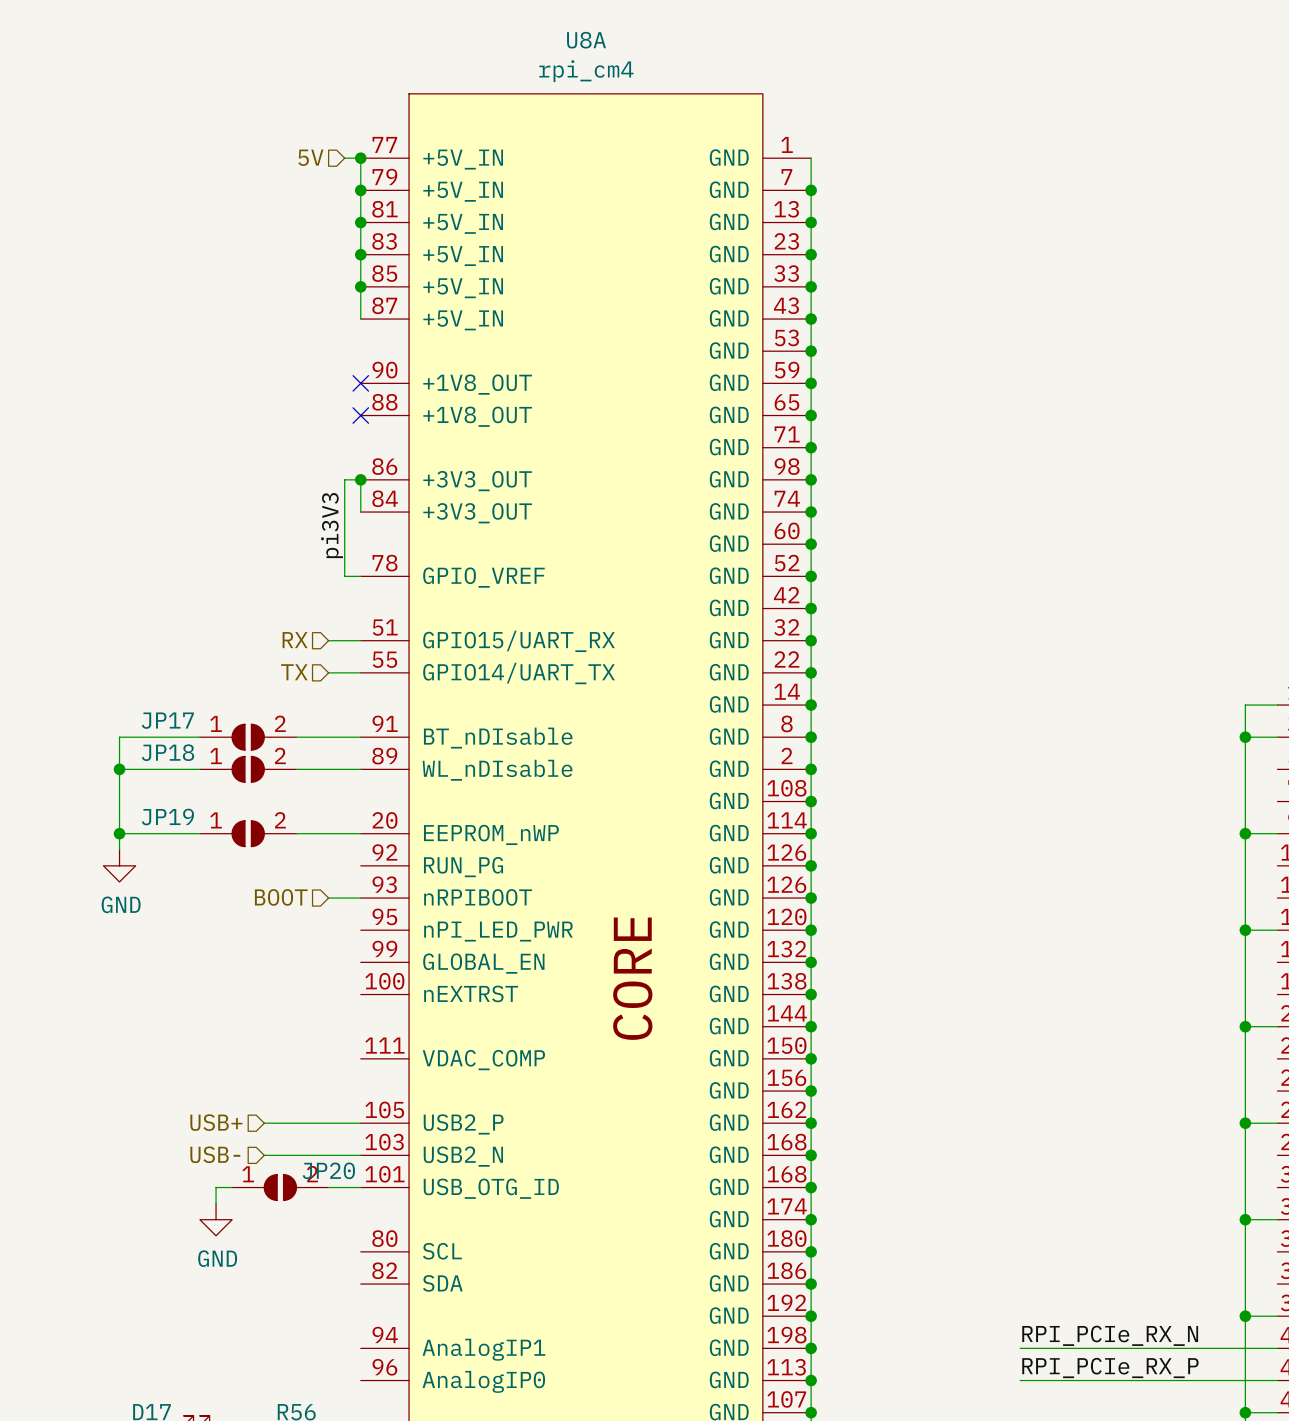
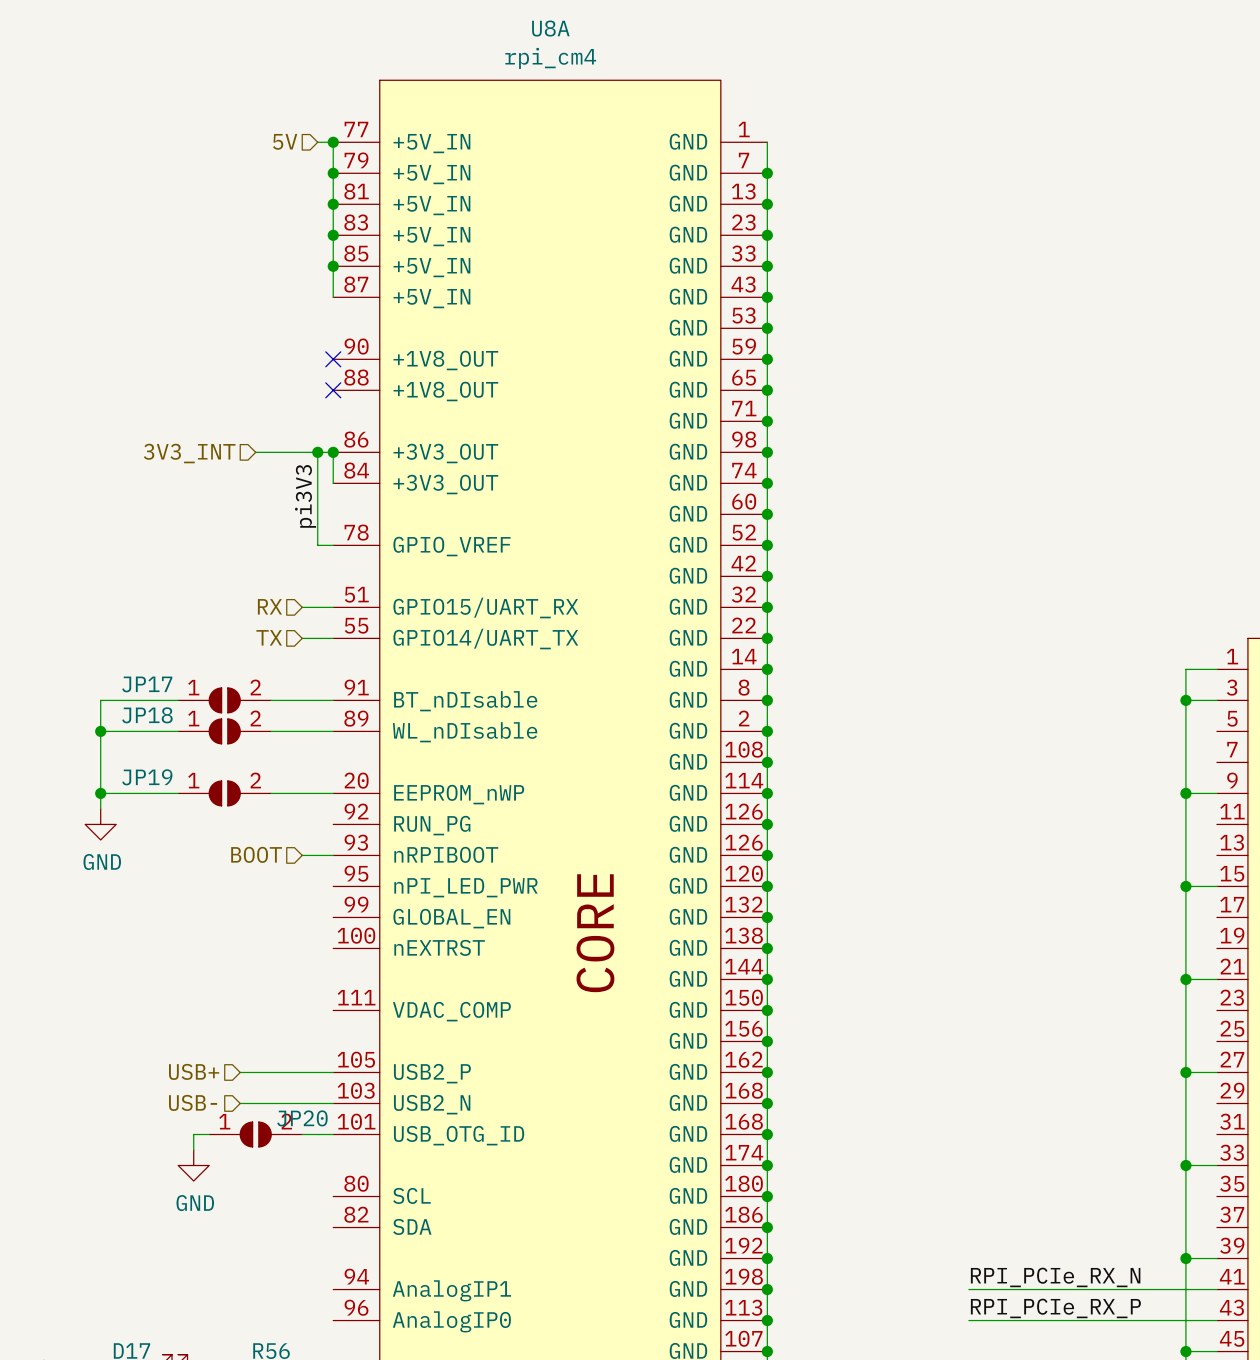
wire: none -> (255, 452) (317, 452)
junction: none -> (317, 452)
hierarchical label: none -> 3V3_INT (189, 453)

